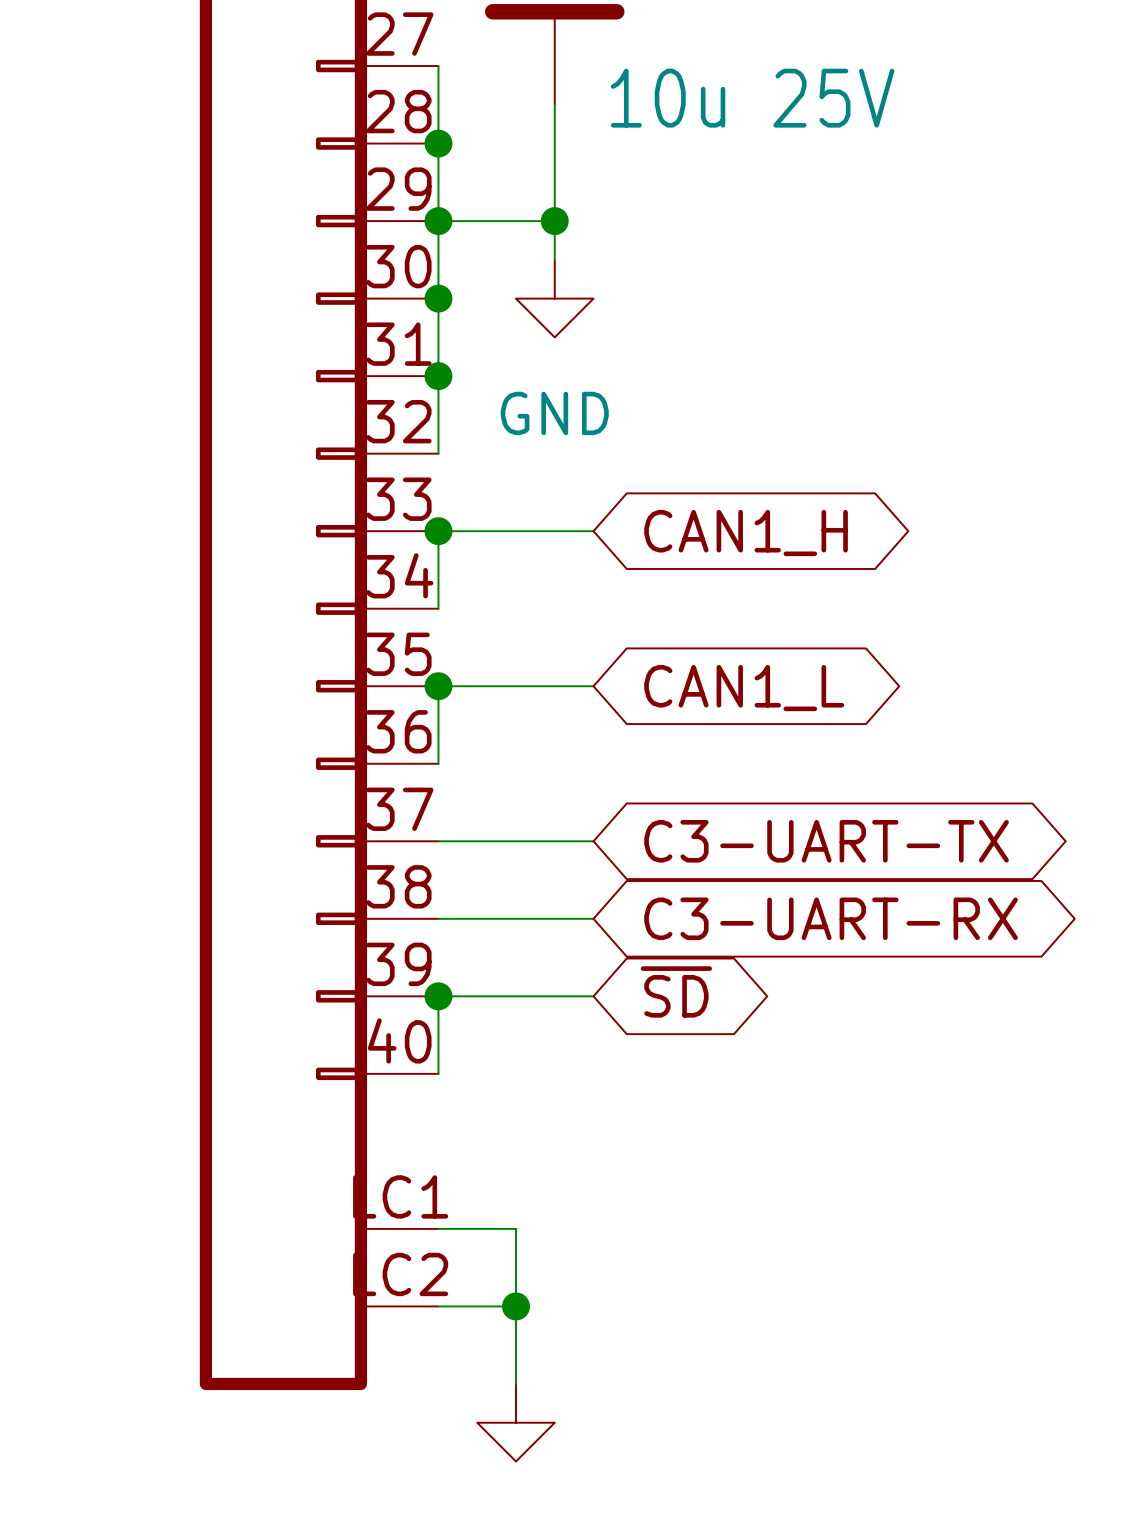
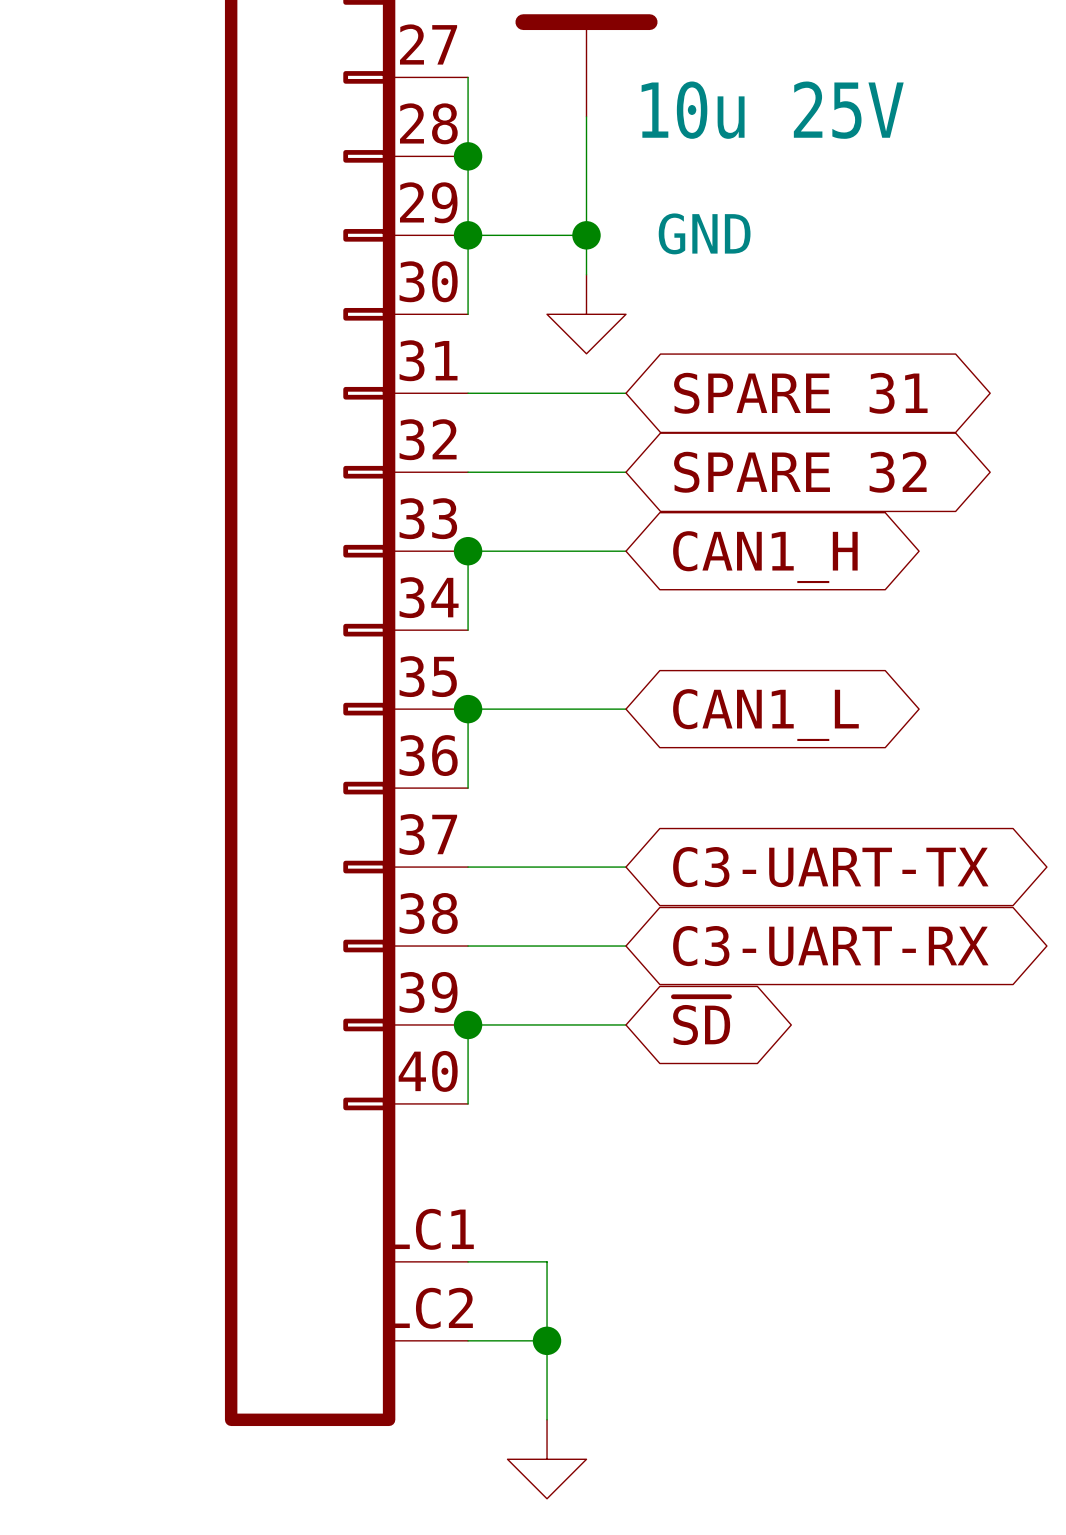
wire: (438, 298) (438, 453) -> (625, 472) (468, 472)
junction: (438, 298) -> none
wire: none -> (468, 393) (625, 393)
junction: (438, 376) -> none
global label: none -> SPARE 31 (800, 393)
power symbol text position: GND (554, 413) -> GND (704, 233)
global label: none -> SPARE 32 (800, 472)

